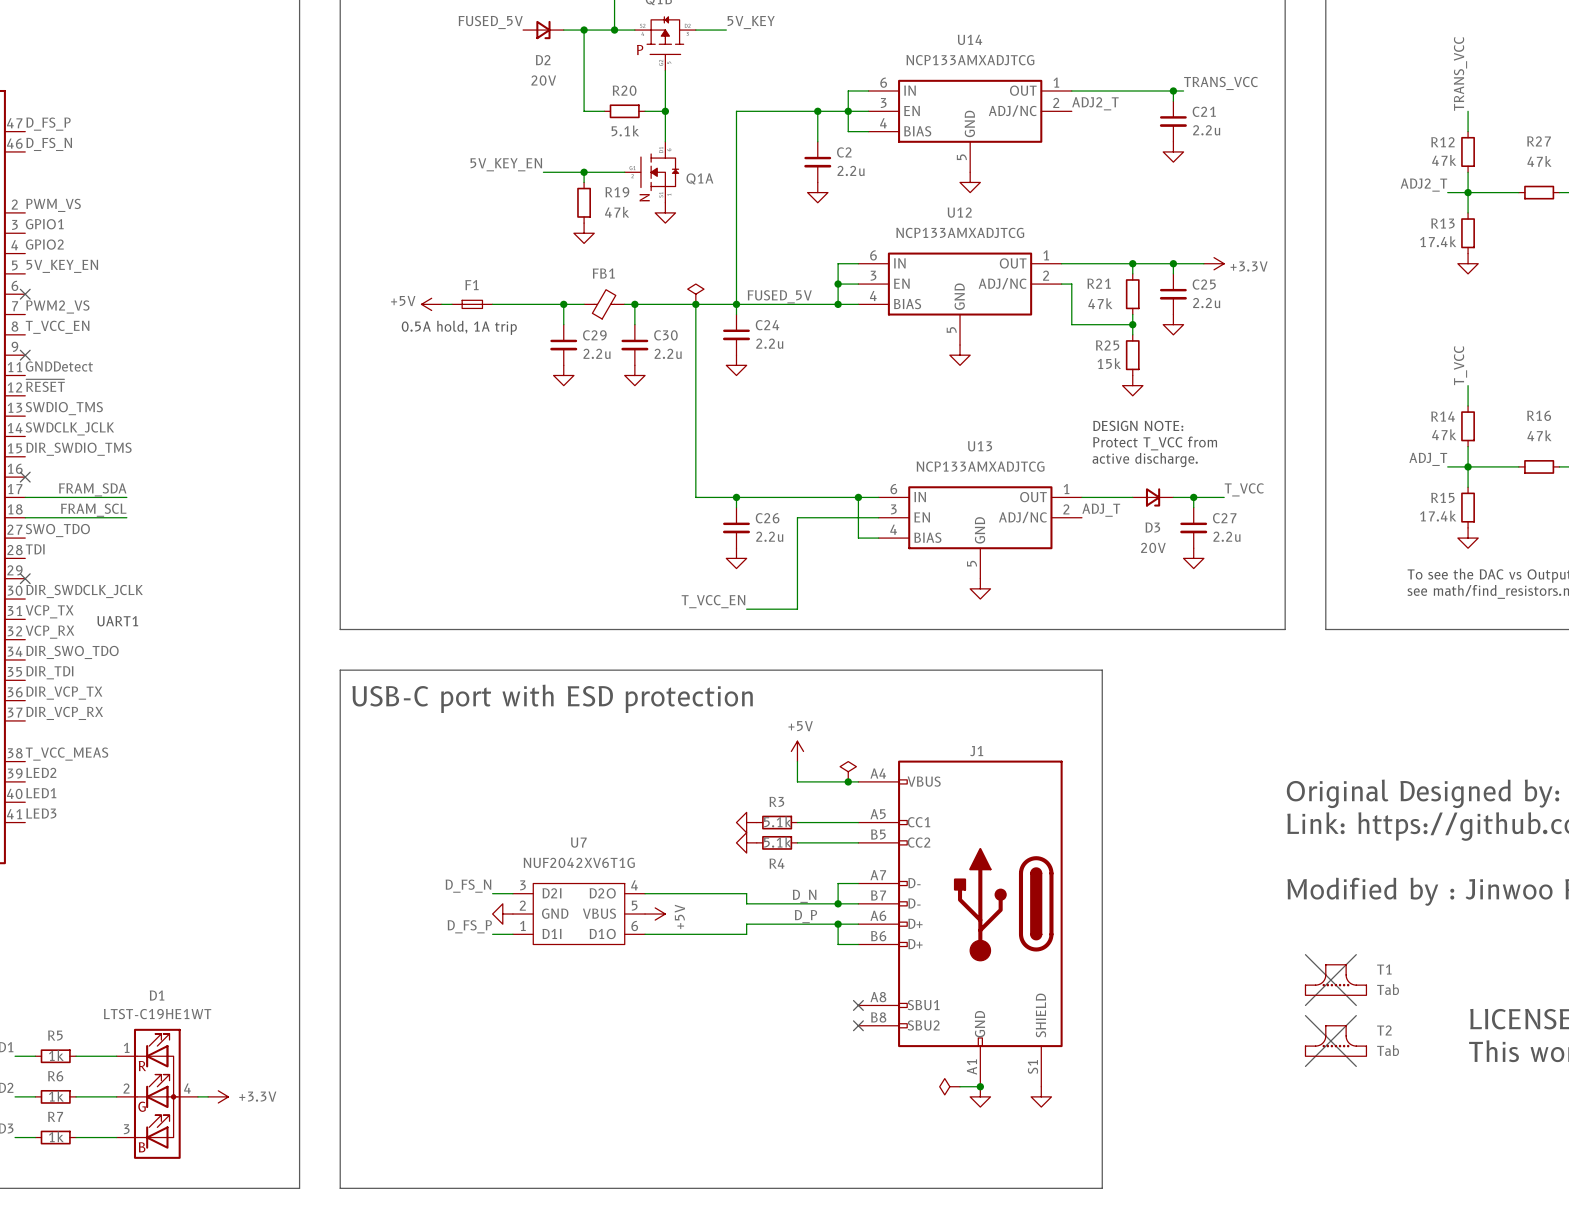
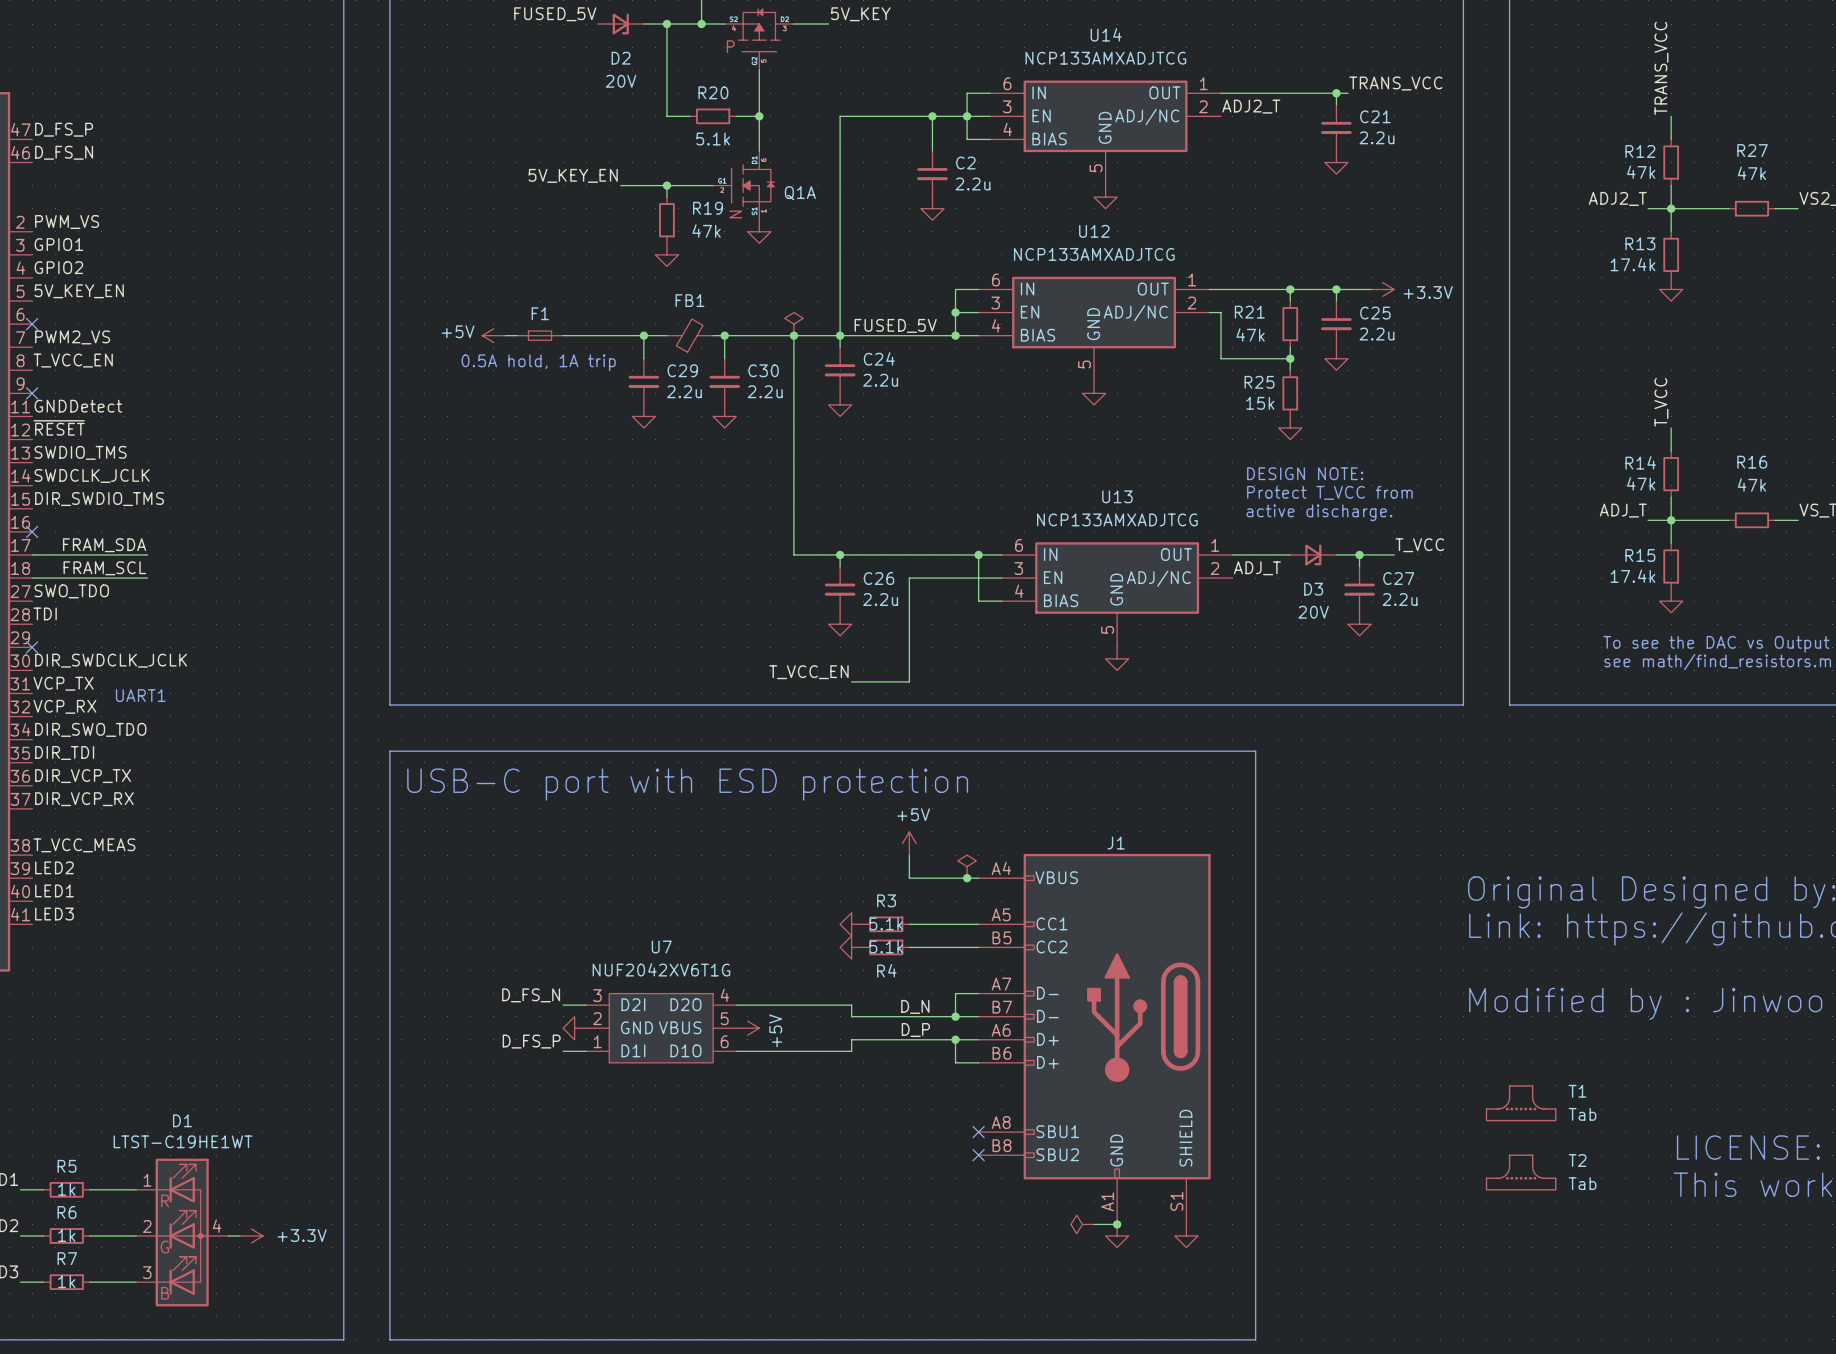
line: (1305, 954) (1356, 1005) -> none
line: (1356, 954) (1305, 1005) -> none
line: (1305, 1015) (1356, 1066) -> none
line: (1356, 1015) (1305, 1066) -> none

